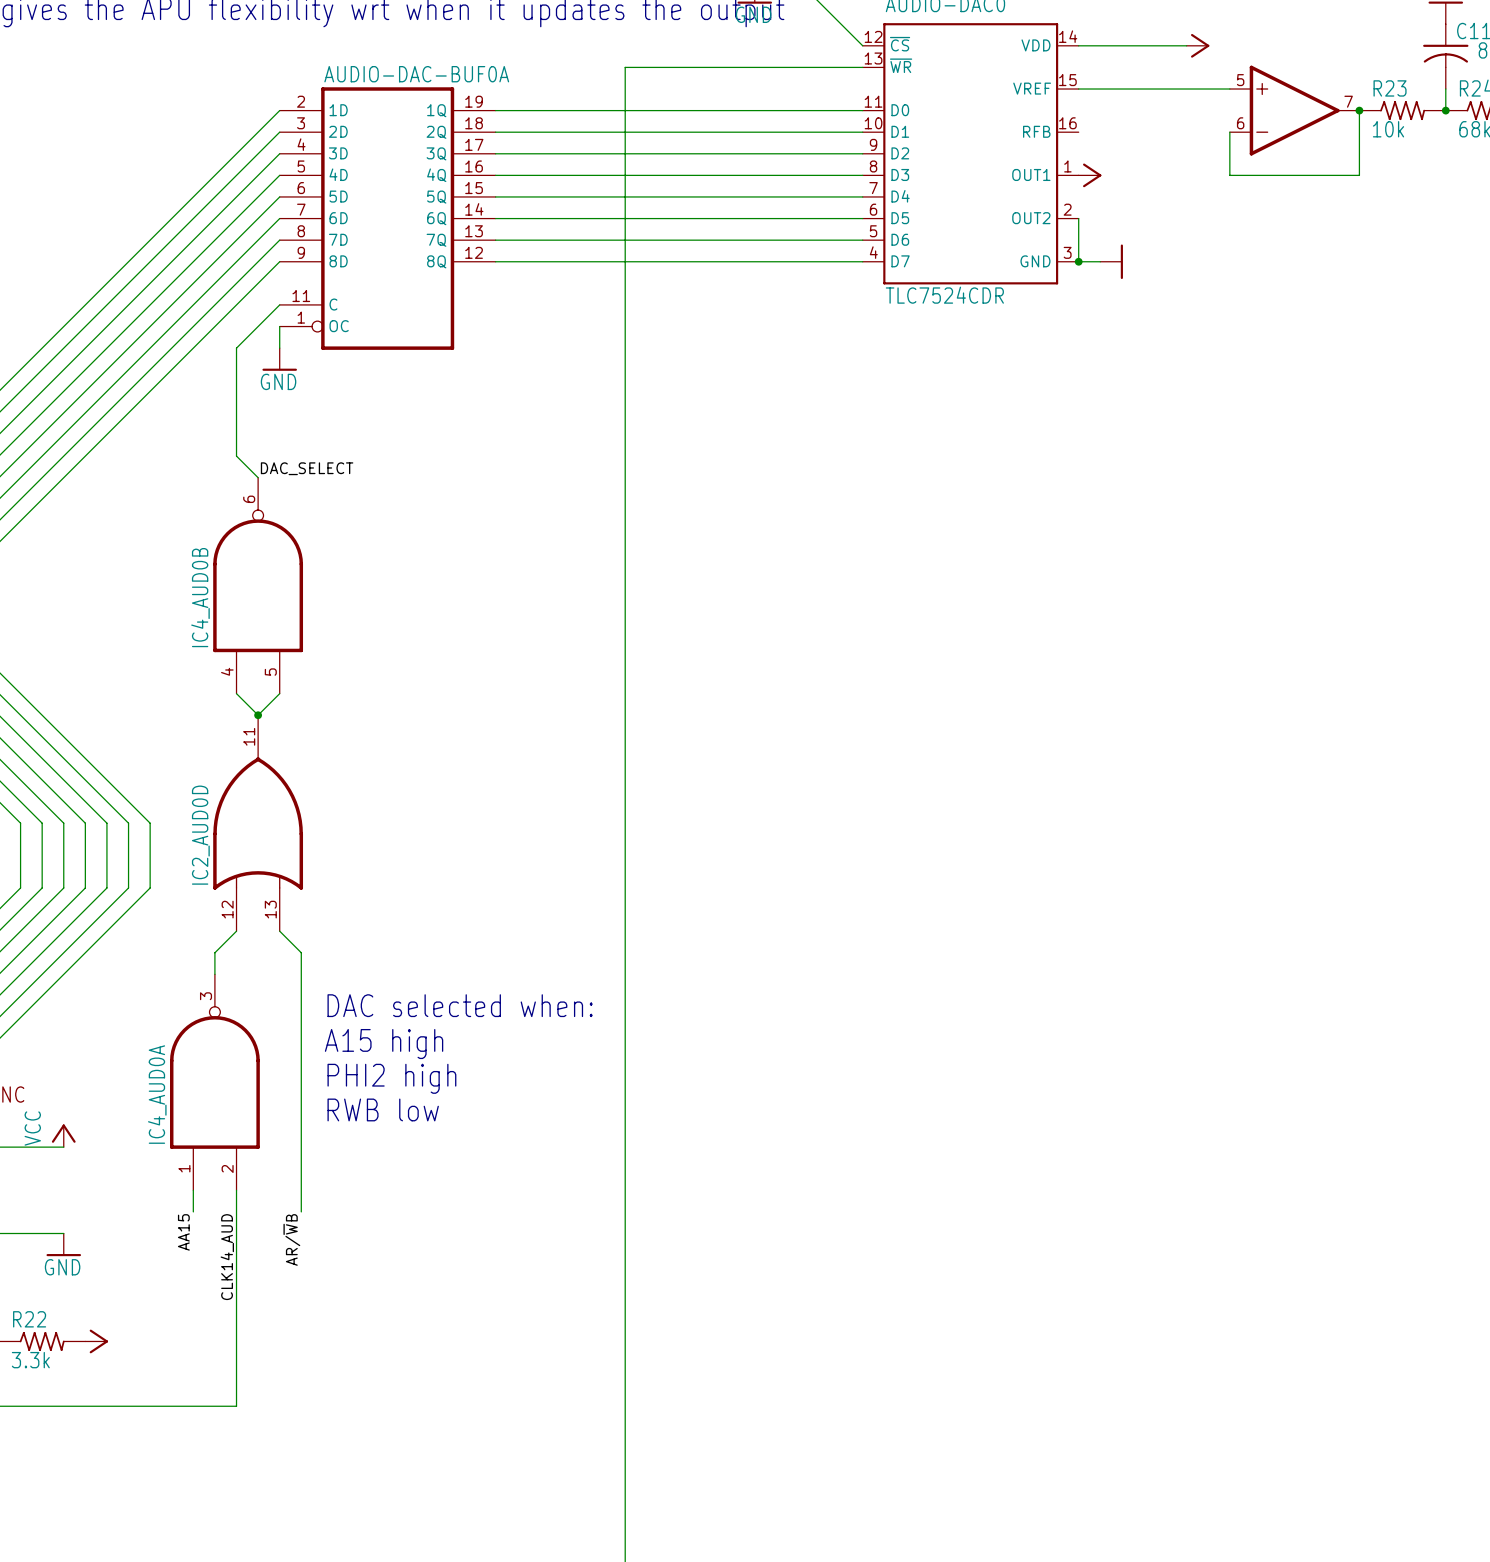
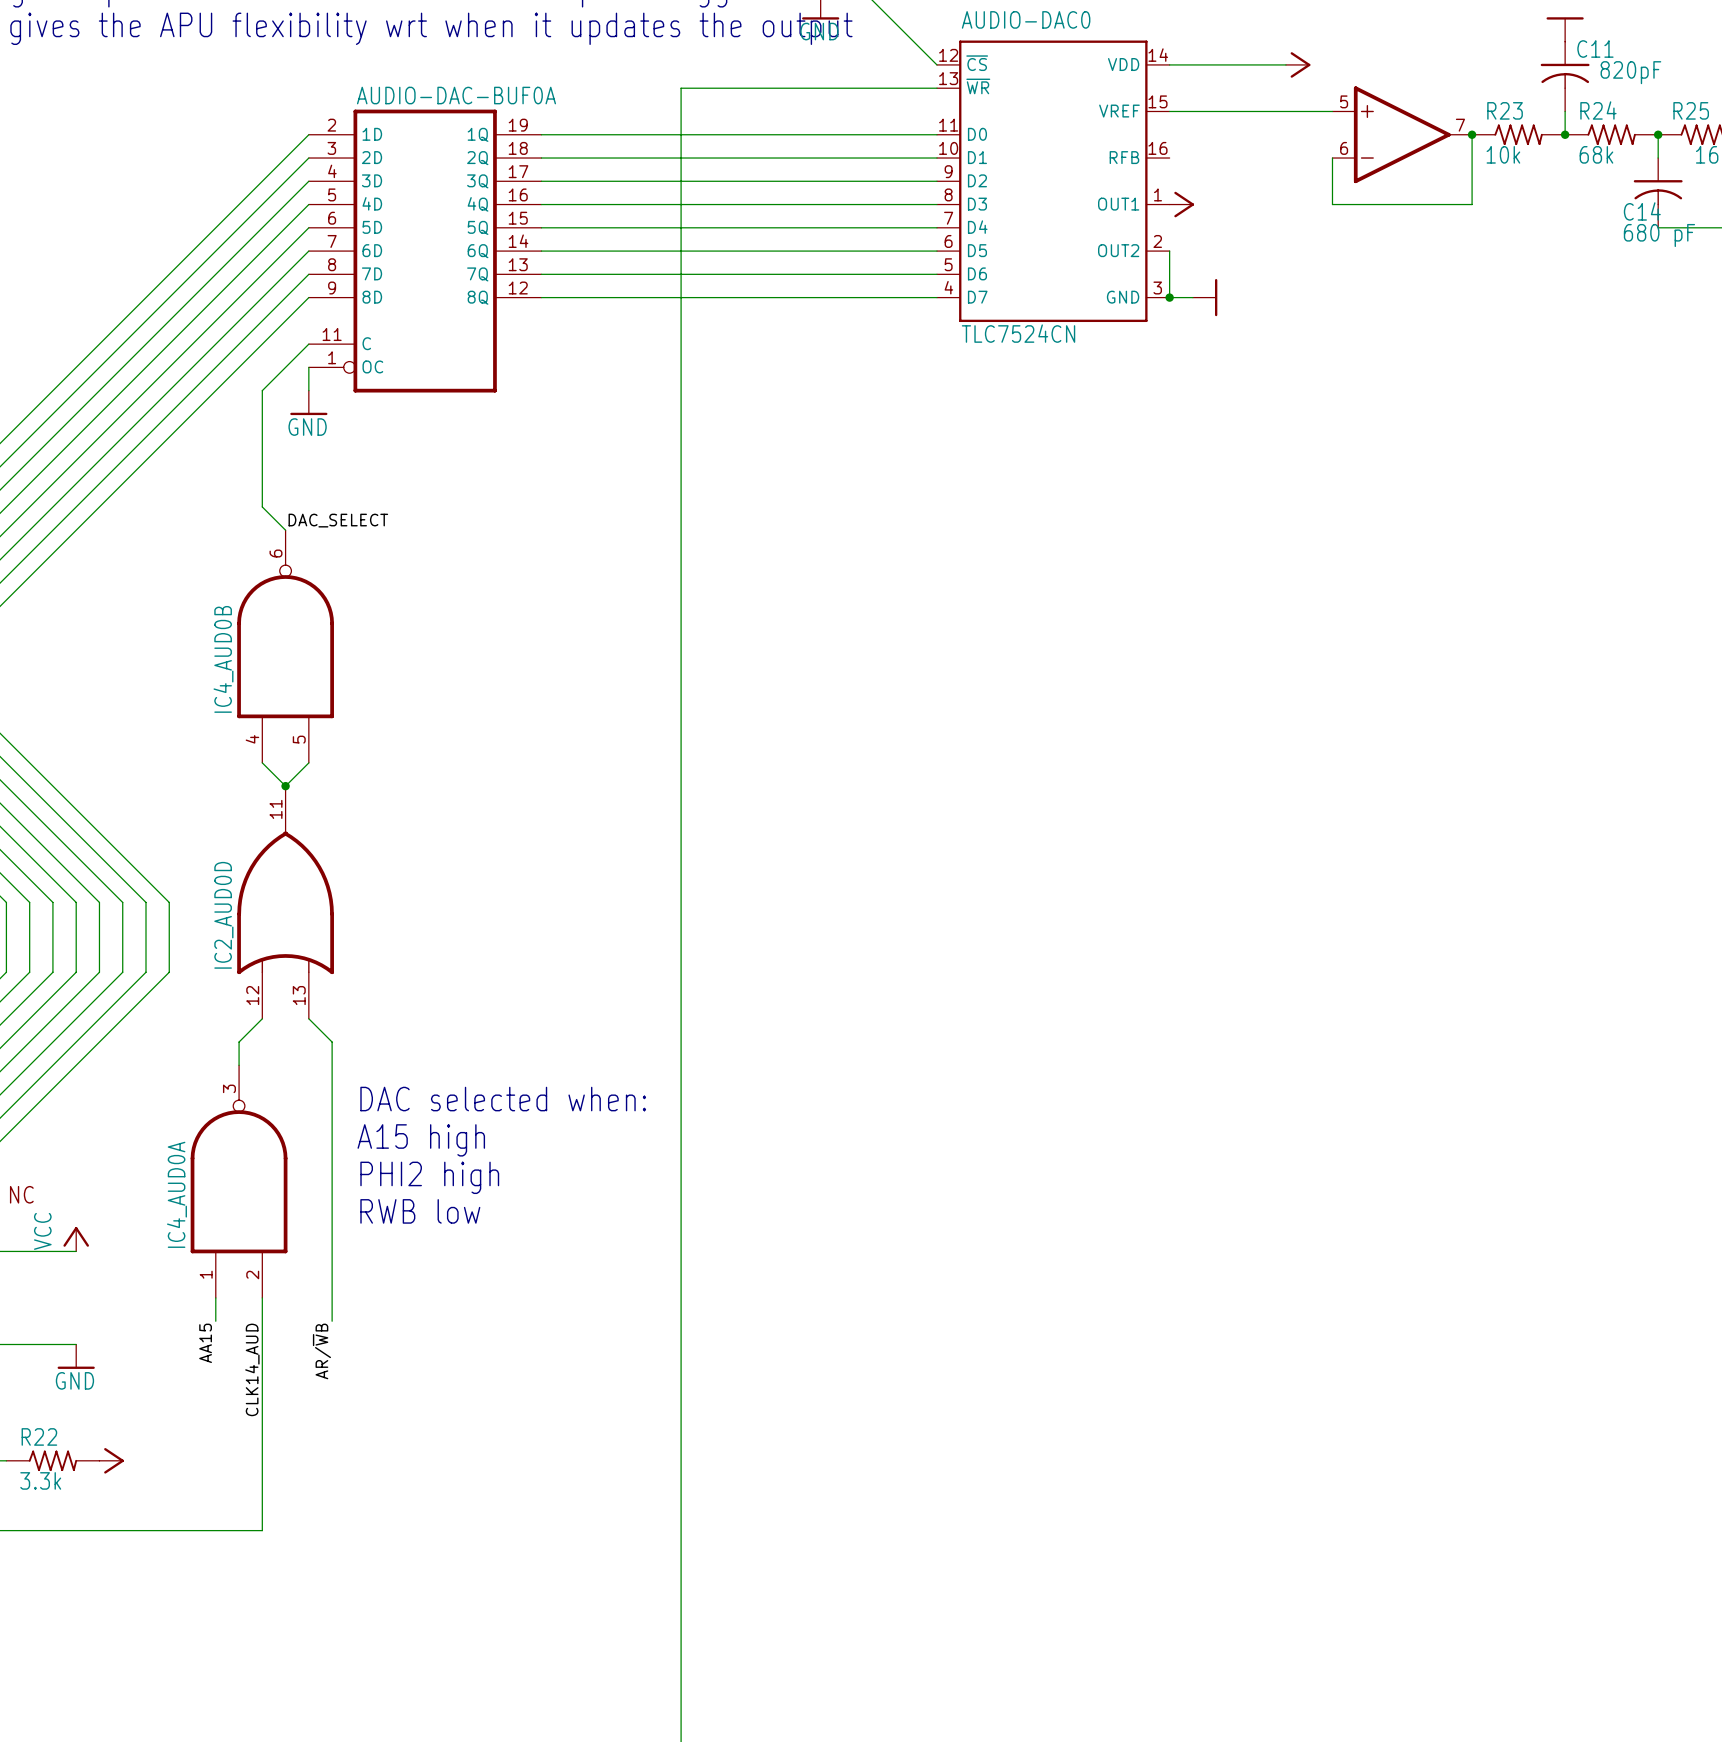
AUDIO-DAC0 value: TLC7524CDR (944, 295) -> TLC7524CN (1018, 333)

